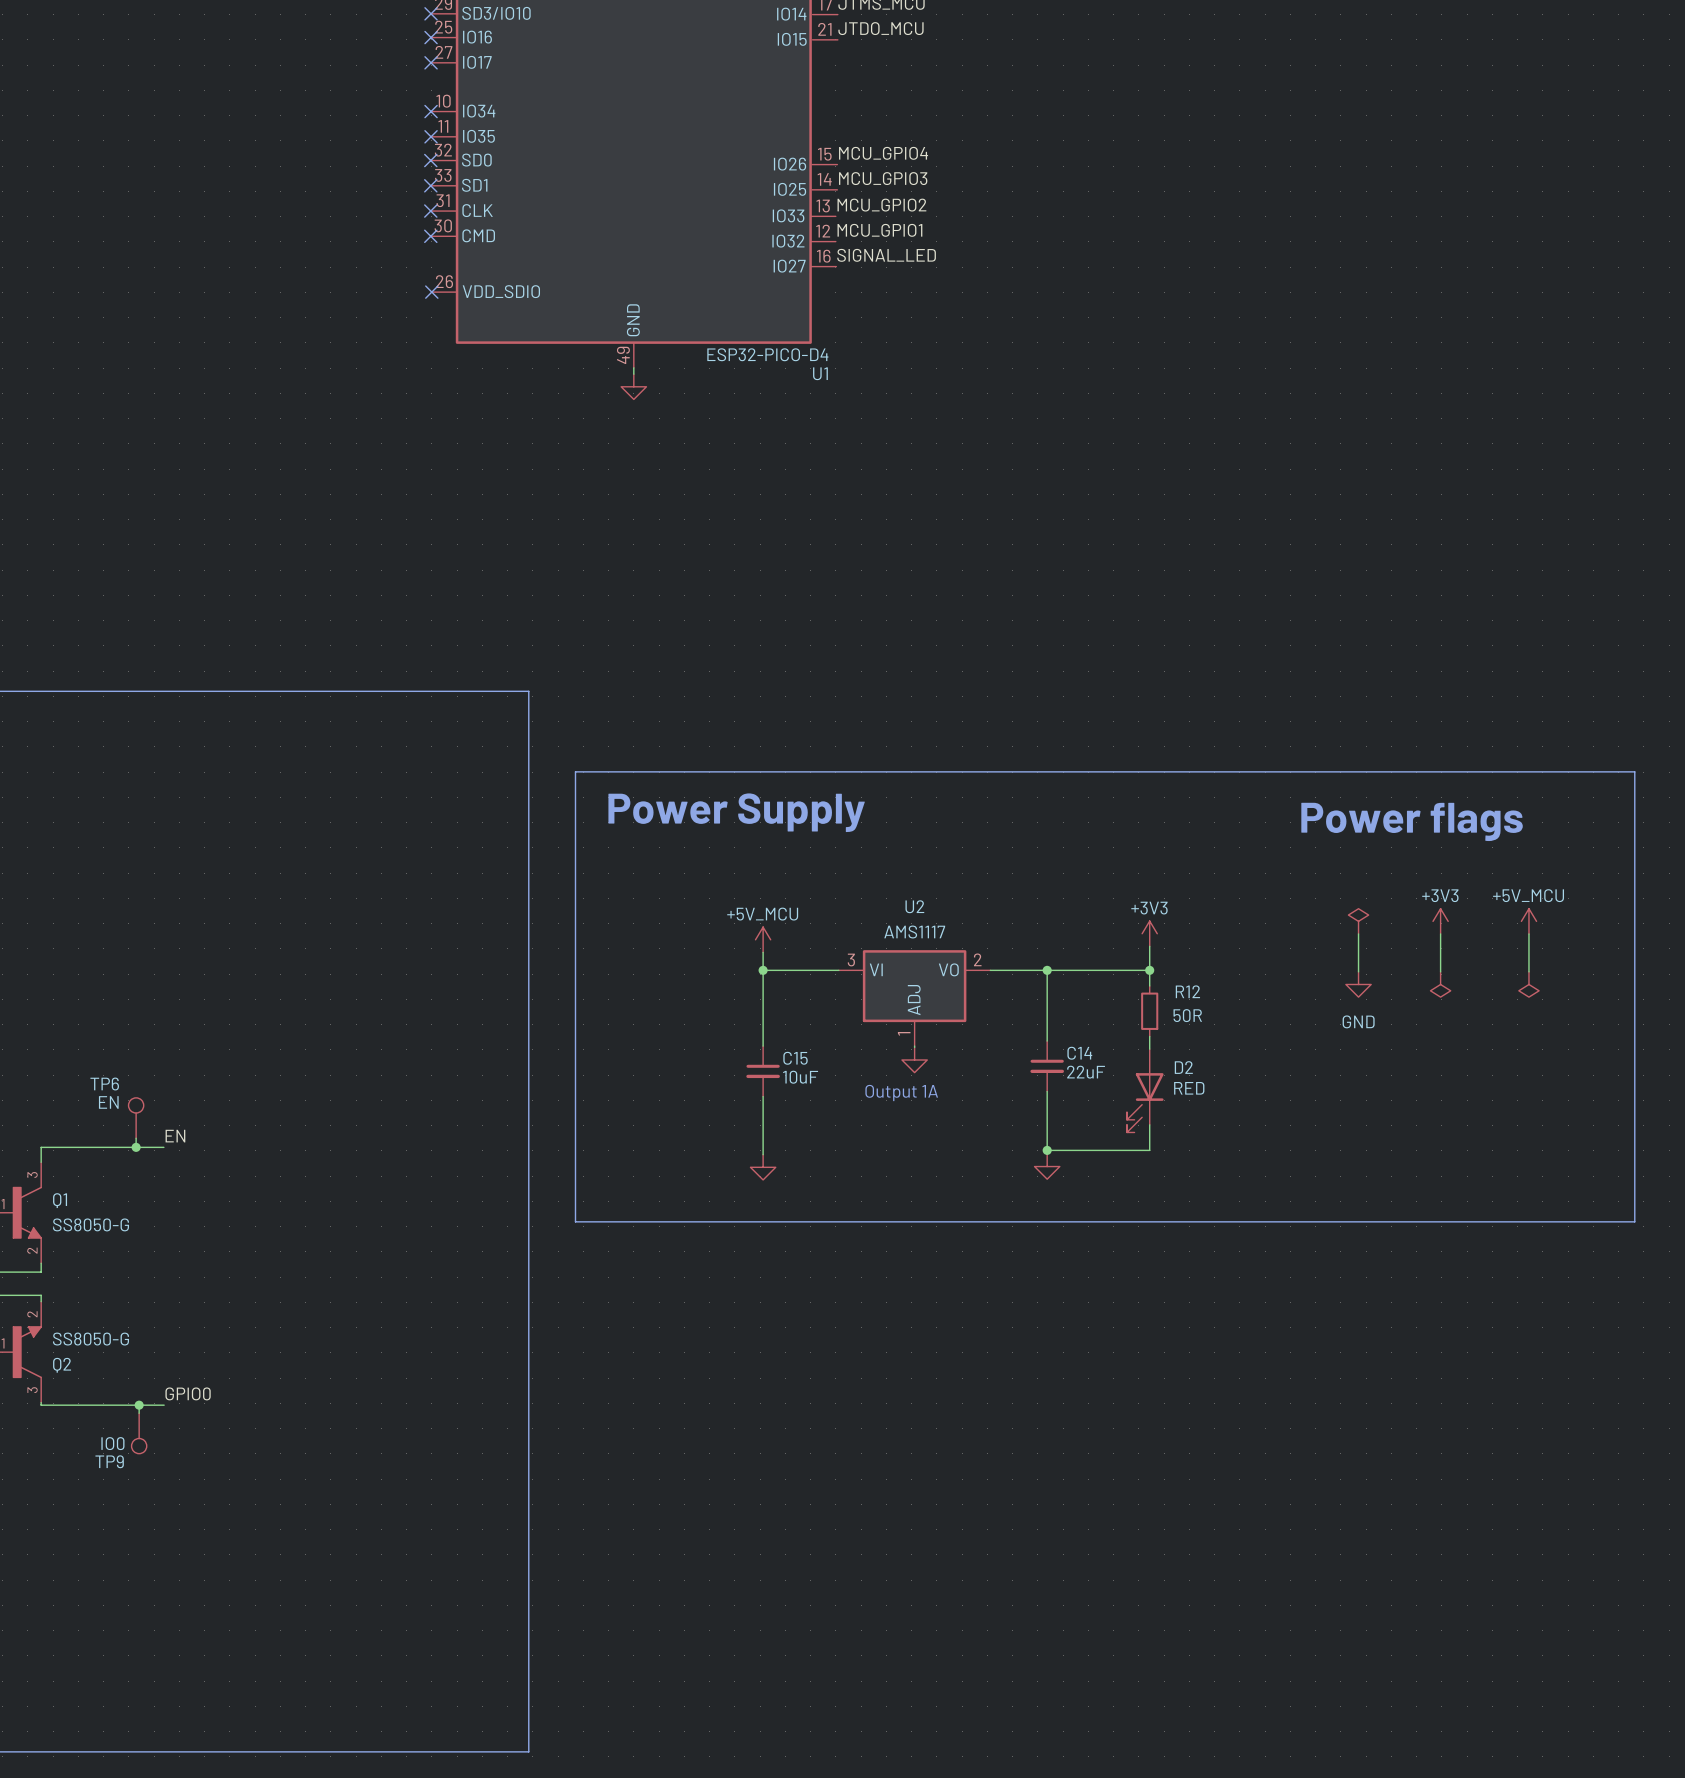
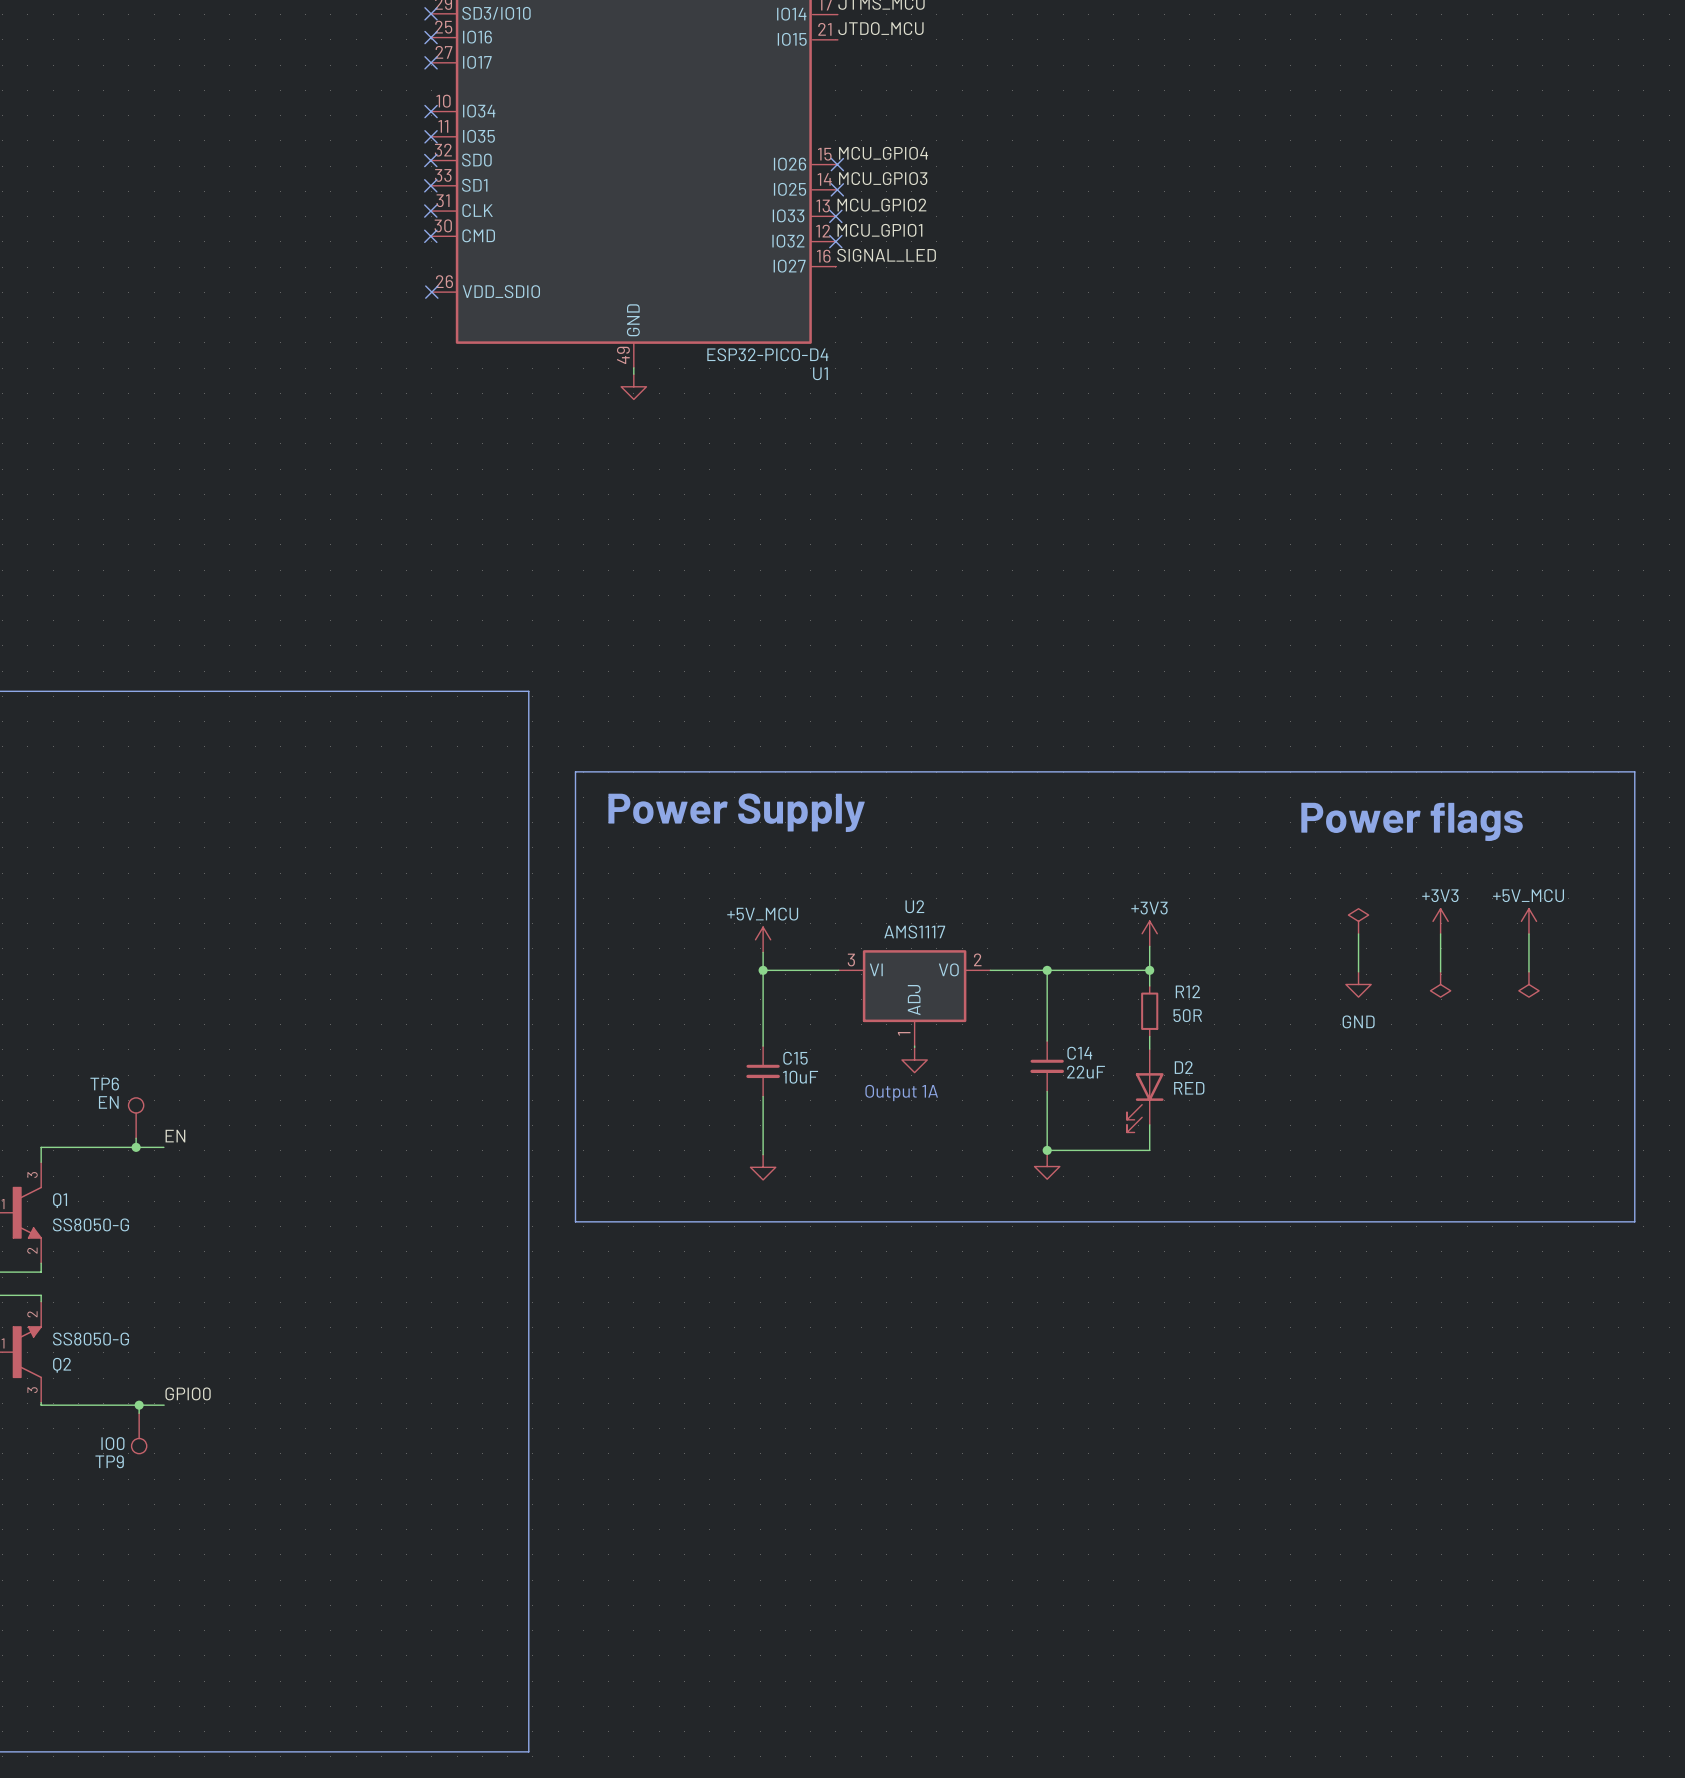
no-connect mark: none -> (837, 164)
no-connect mark: none -> (837, 189)
no-connect mark: none -> (835, 216)
no-connect mark: none -> (835, 241)

